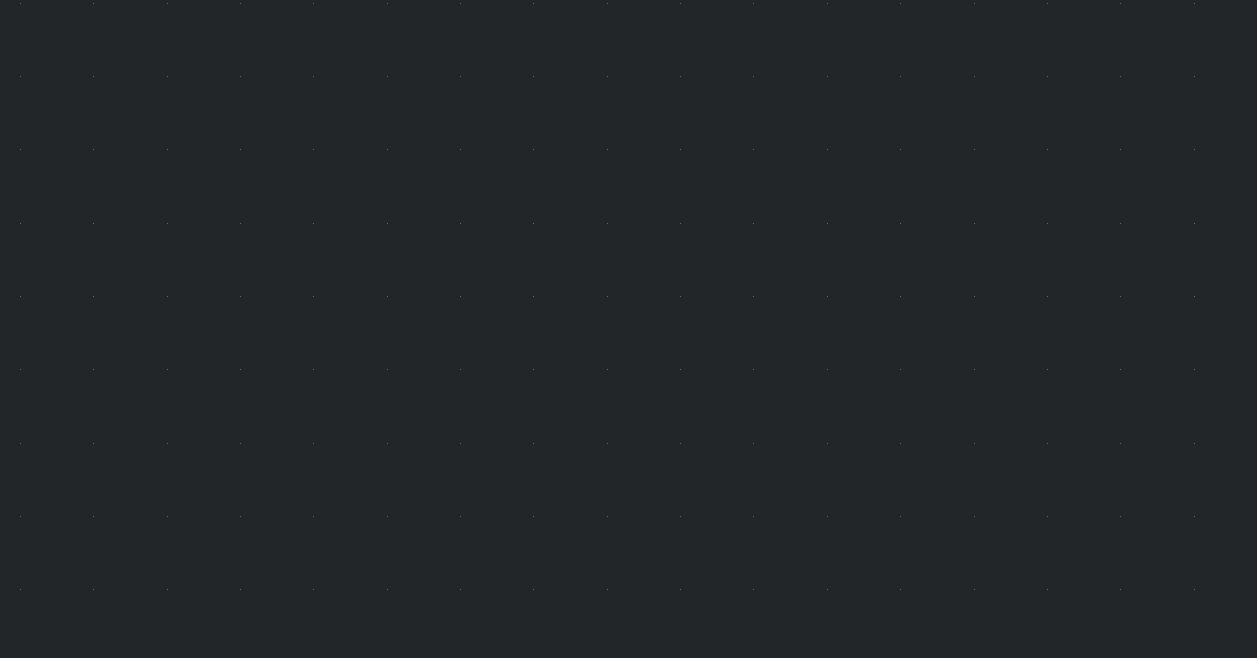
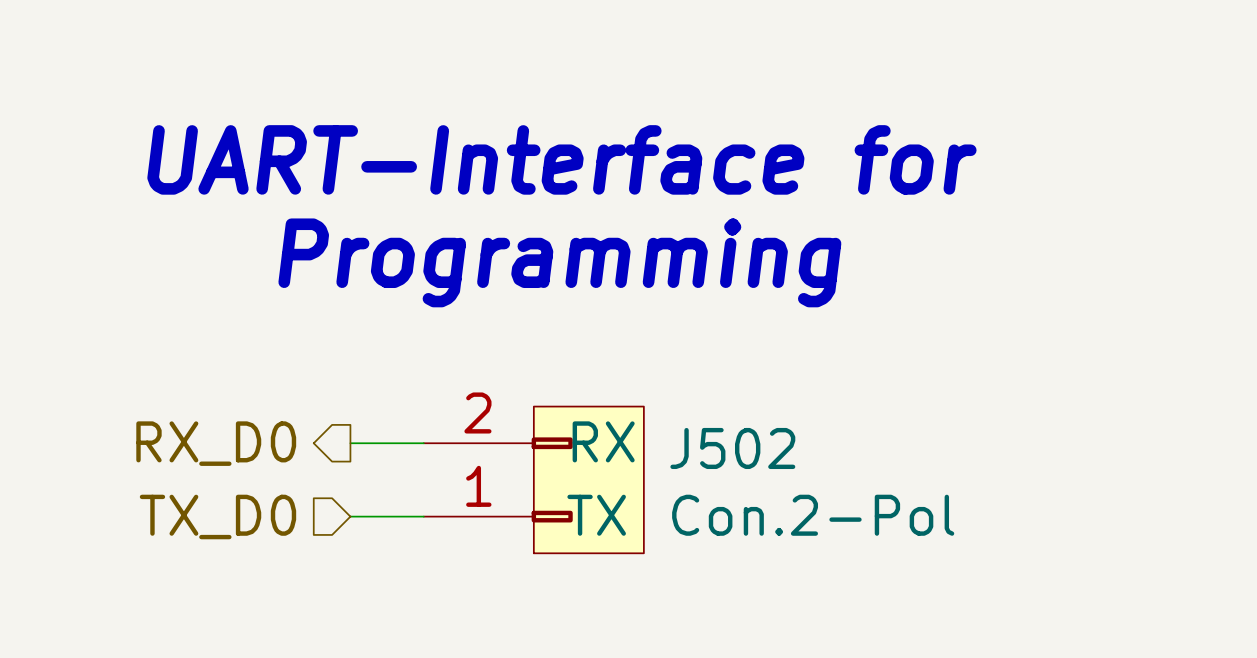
text: none -> UART-Interface for (561, 159)
text: none -> Programming (559, 262)
hierarchical label: none -> RX_D0 (216, 443)
wire: none -> (350, 443) (423, 443)
J502: none -> Con.2-Pol (533, 479)
hierarchical label: none -> TX_D0 (217, 516)
wire: none -> (350, 516) (423, 516)

